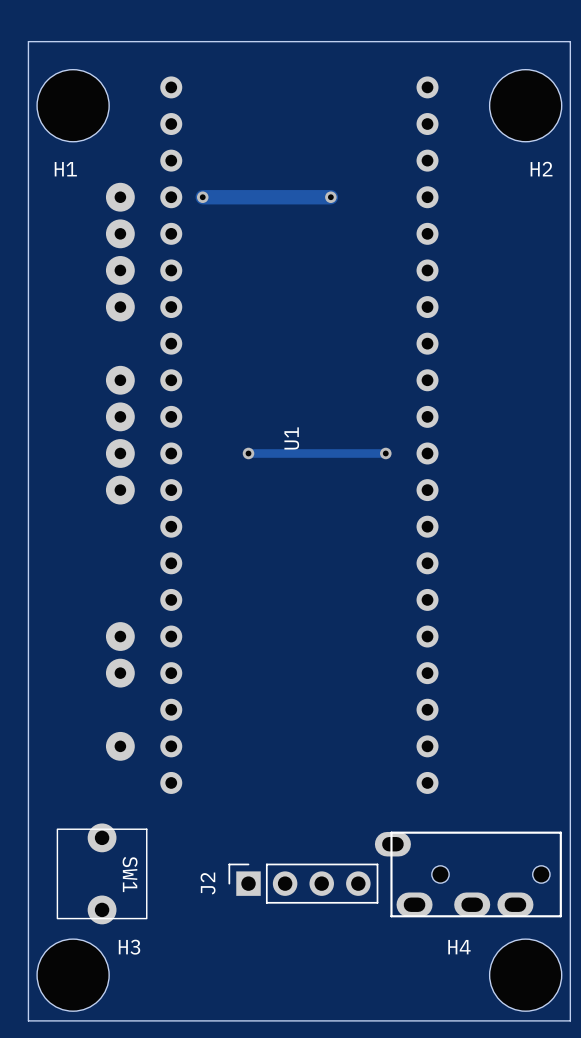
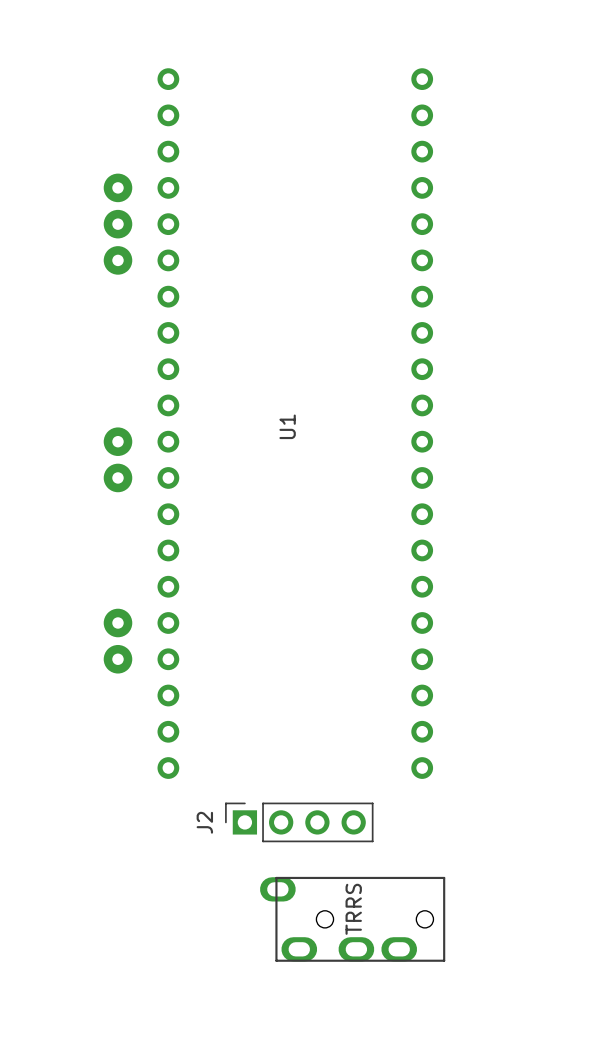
board edge: (28, 41) (570, 41) (570, 1020) (28, 1020) (28, 41) -> none
H1: (73, 105) -> none
H2: (525, 105) -> none
track: (202, 197) (330, 197) -> none
via: (202, 197) -> none
via: (330, 197) -> none
part: (120, 307) -> none
part: (120, 380) -> none
part: (120, 416) -> none
track: (248, 453) (385, 453) -> none
via: (248, 453) -> none
via: (385, 453) -> none
part: (120, 746) -> none
SW1: (102, 873) -> none
part: (468, 874) -> none
J2 position: (303, 883) -> (299, 822)
part: none -> (352, 919)
H3: (73, 975) -> none
H4: (525, 975) -> none

